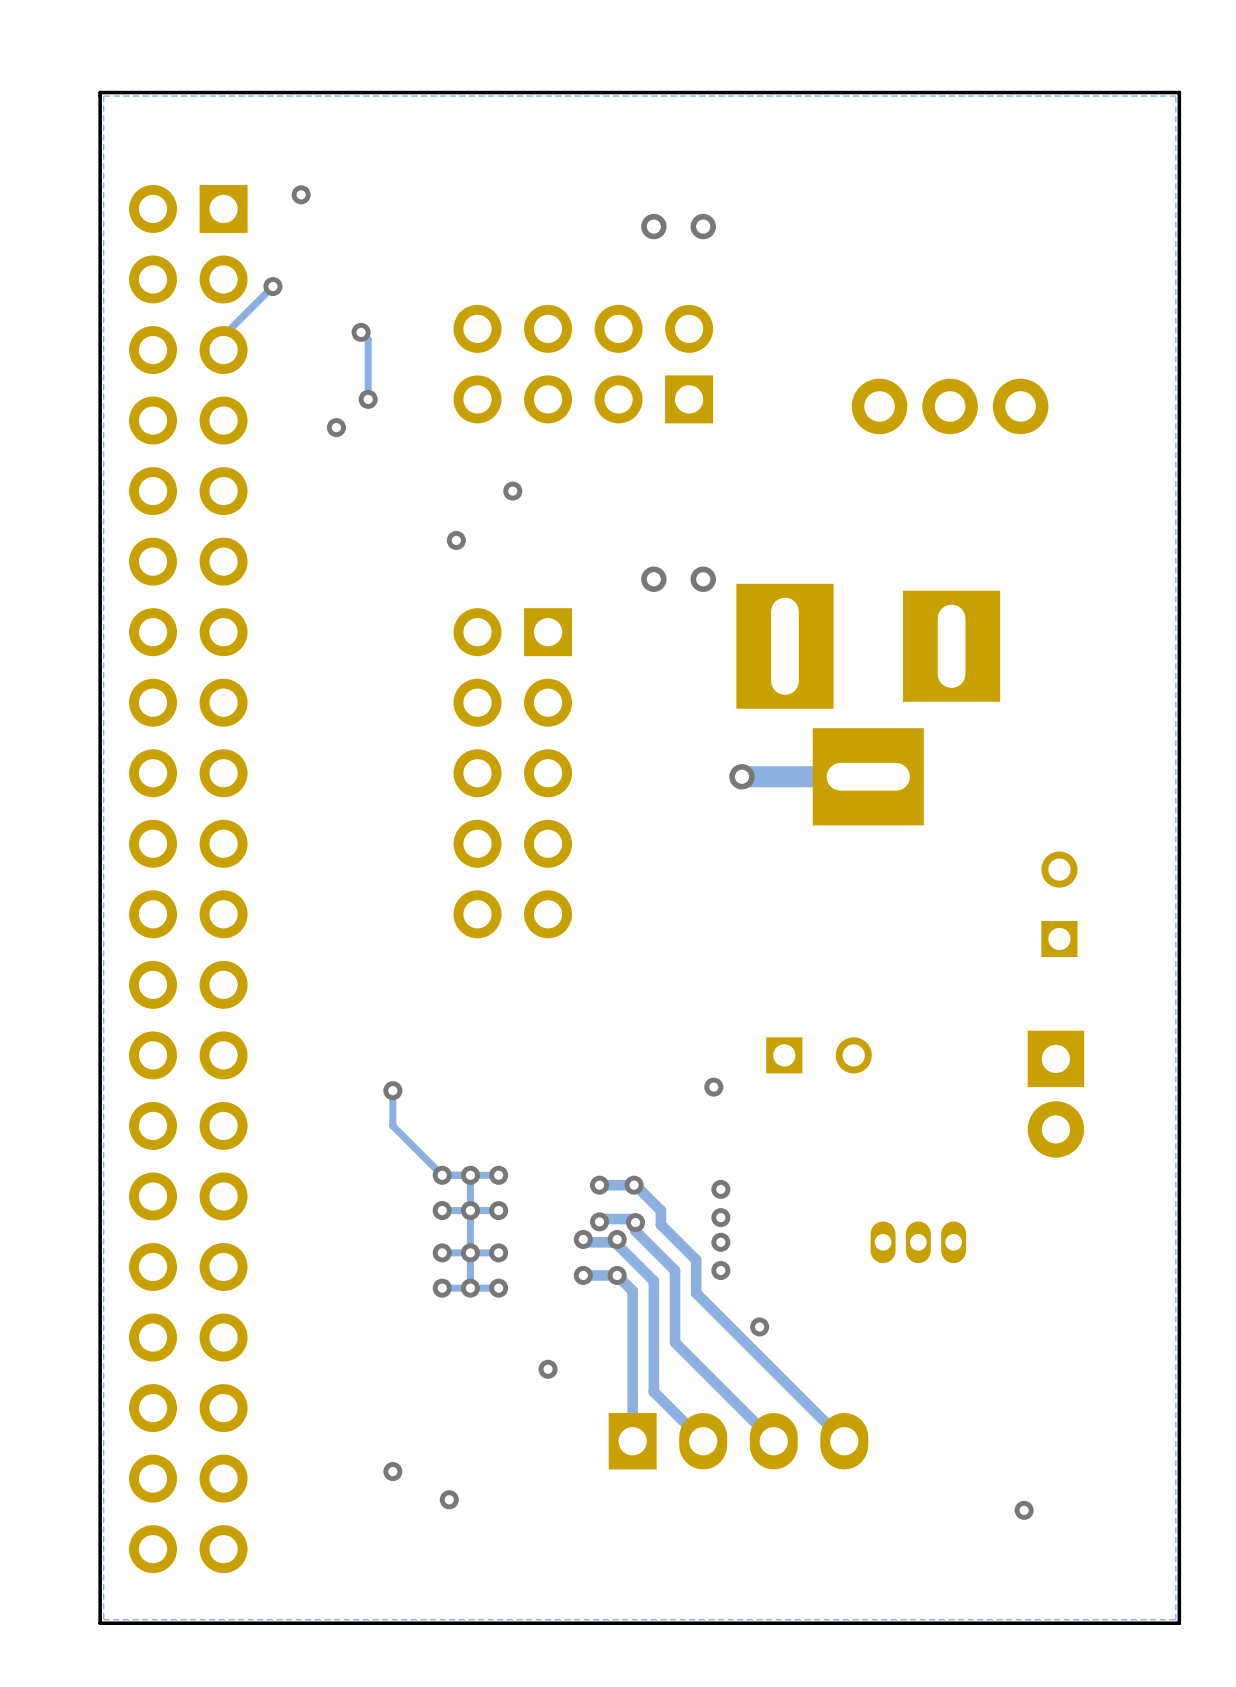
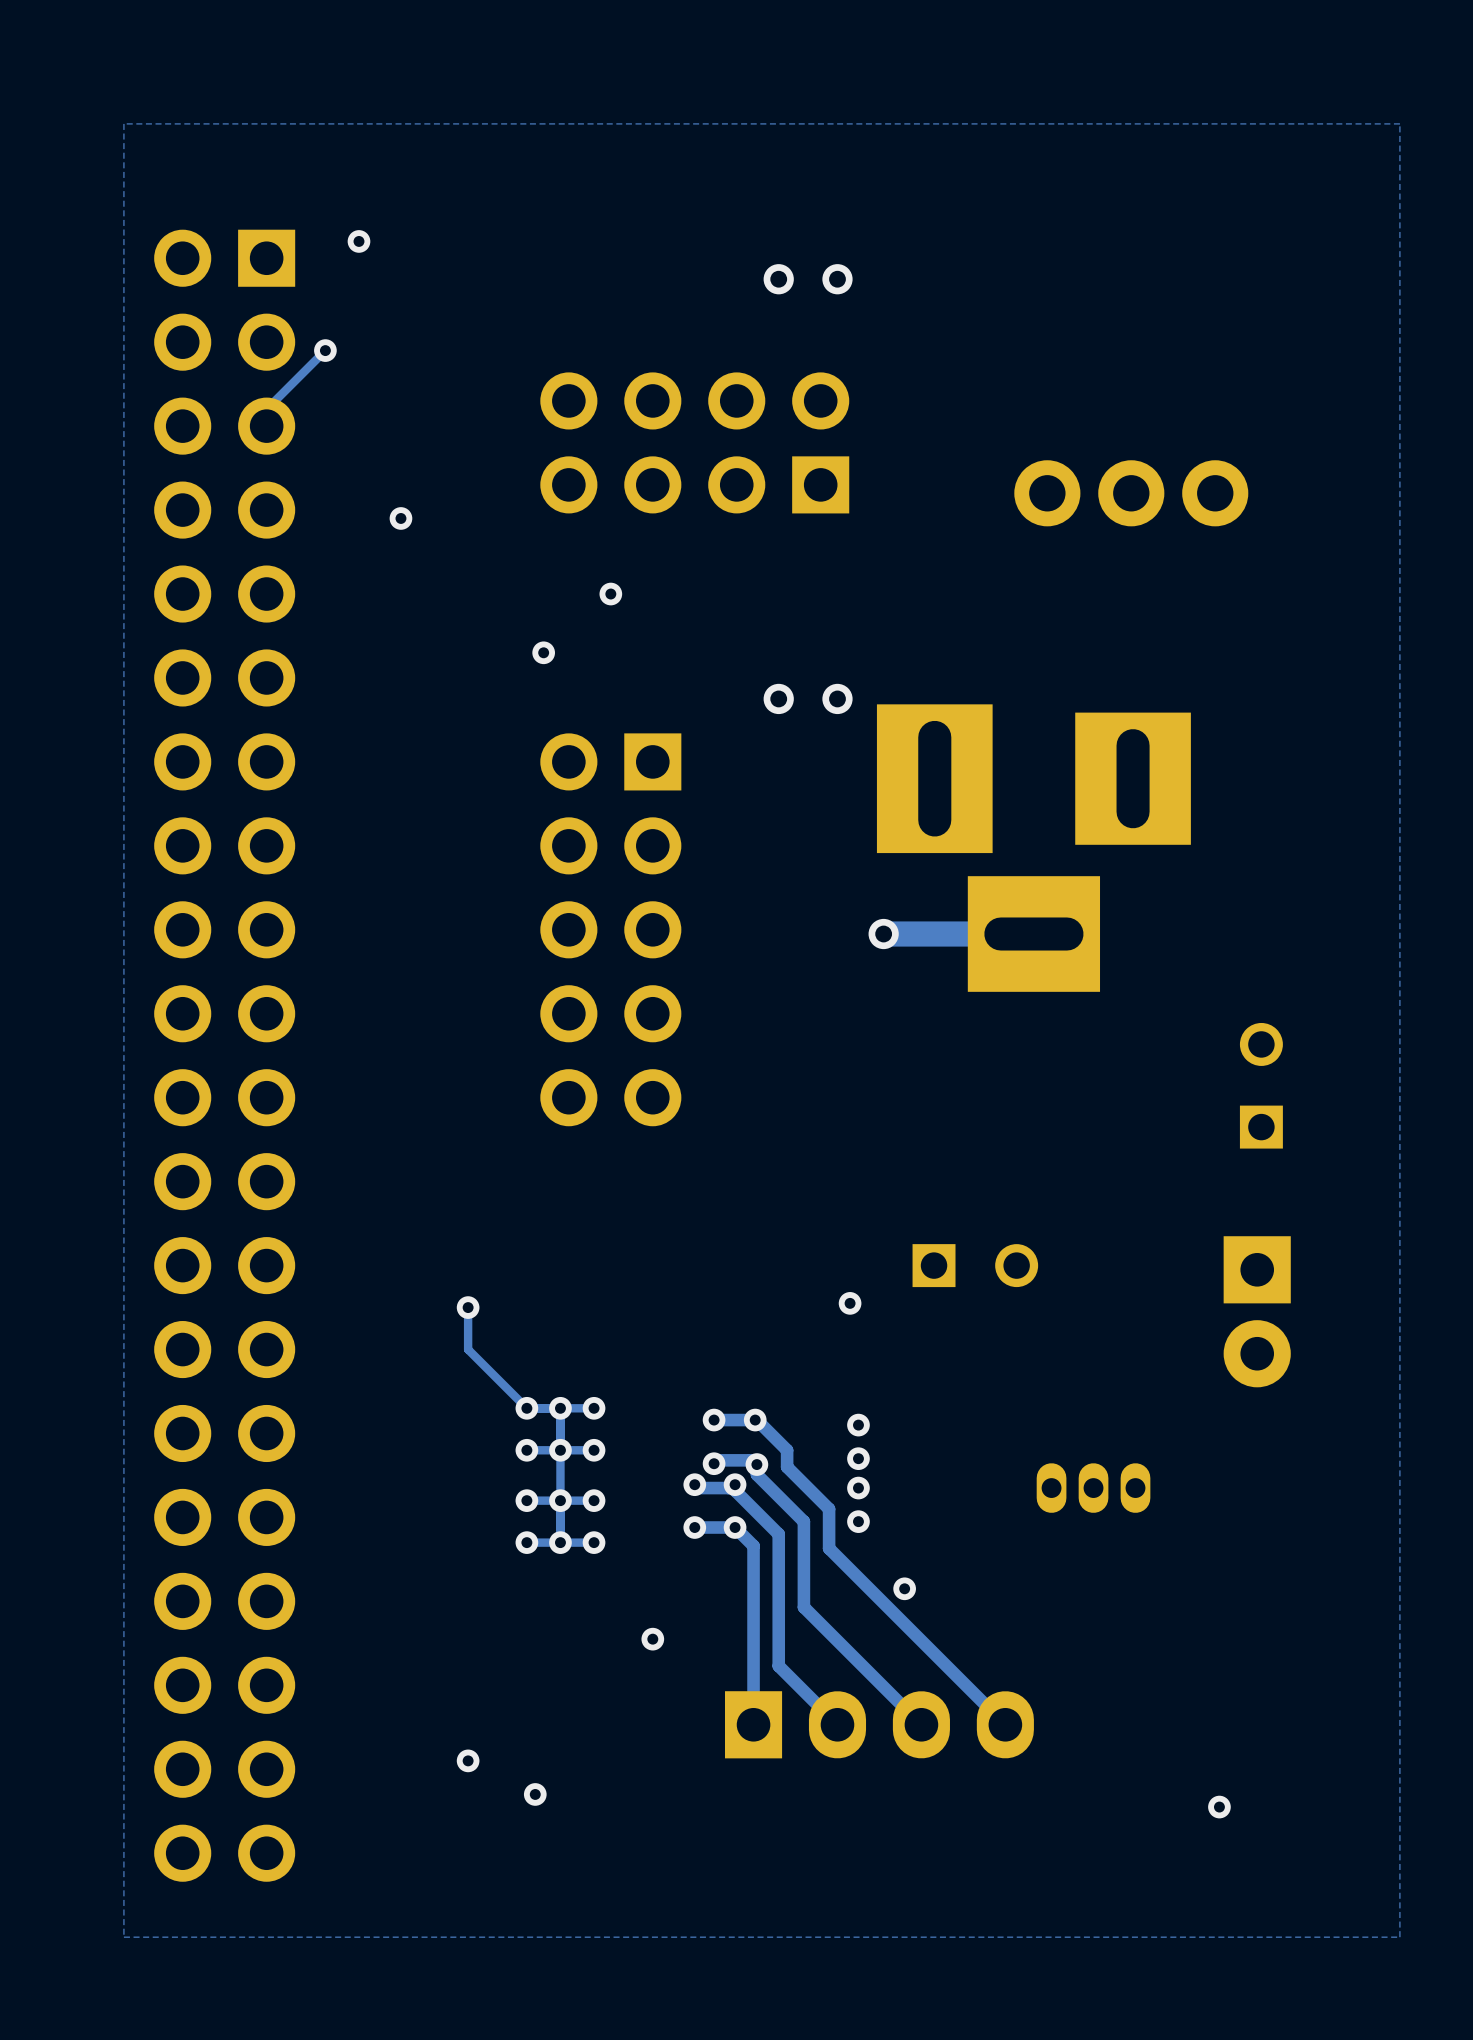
board edge: (1179, 92) (100, 92) (100, 1623) (1179, 1623) (1179, 92) -> none
track: (361, 332) (368, 339) (368, 399) -> none
via: (361, 332) -> none
via: (368, 399) -> none

